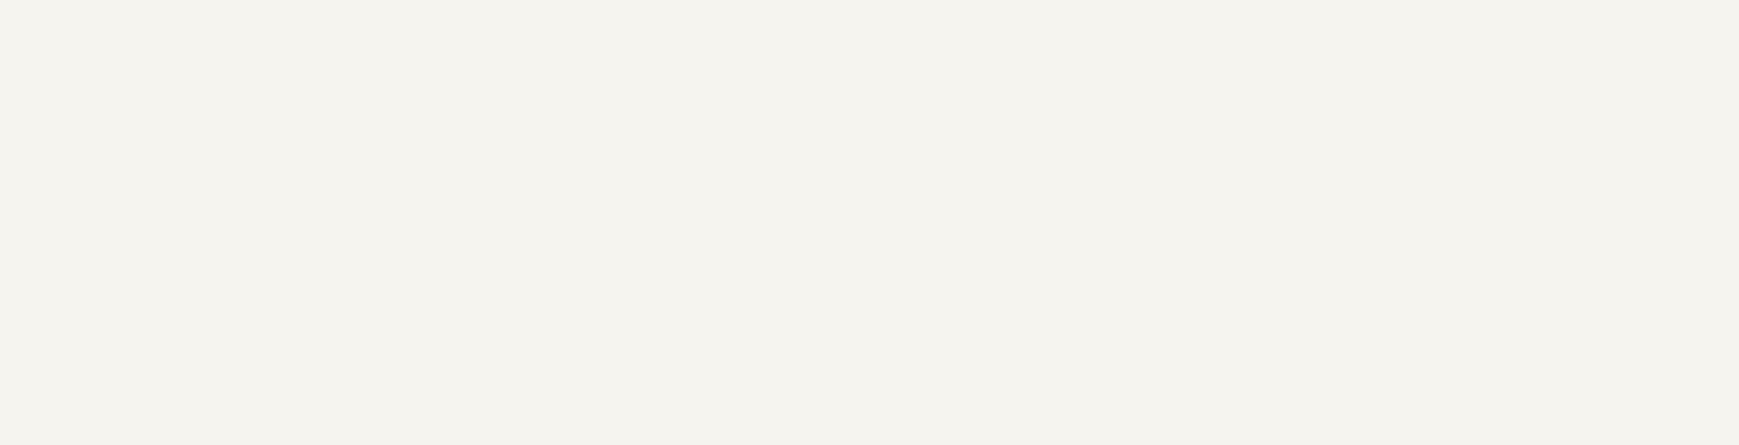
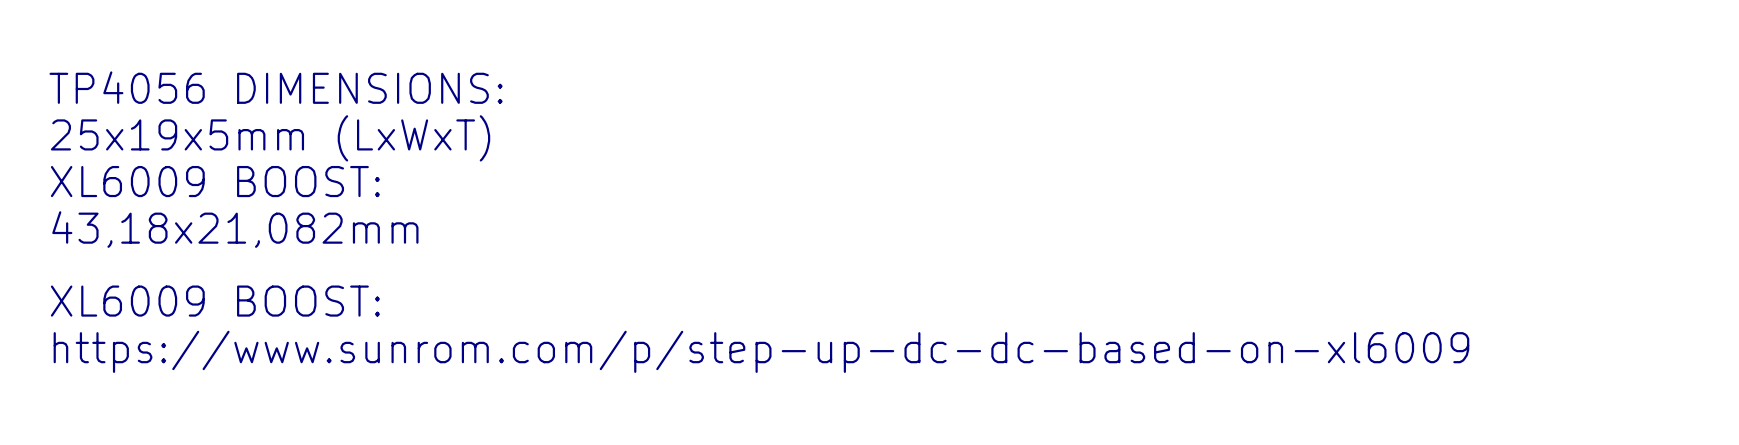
text: none -> TP4056 DIMENSIONS: (276, 87)
text: none -> 25x19x5mm (LxWxT) (270, 138)
text: none -> XL6009 BOOST: (215, 181)
text: none -> 43,18x21,082mm (235, 229)
text: none -> XL6009 BOOST: (215, 301)
text: none -> https://www.sunrom.com/p/step-up-dc-dc-based-on-xl6009 (761, 351)

